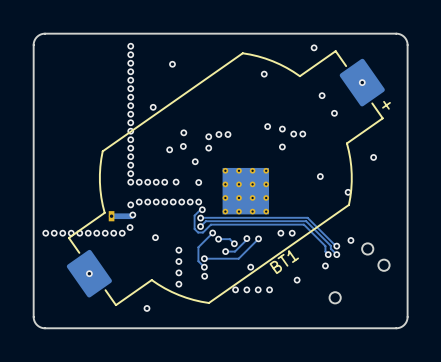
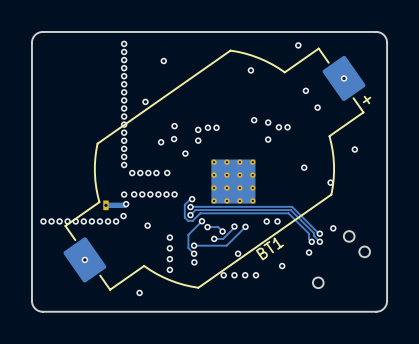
via: (130, 182) -> none
via: (198, 182) -> none
via: (139, 202) -> none
via: (147, 202) -> none
via: (156, 202) -> none
via: (164, 202) -> none
via: (173, 202) -> none
via: (181, 202) -> none
via: (190, 202) -> none
via: (198, 202) -> none
via: none -> (134, 194)
via: none -> (142, 194)
via: none -> (150, 194)
via: none -> (158, 194)
via: none -> (166, 194)
via: none -> (174, 194)

